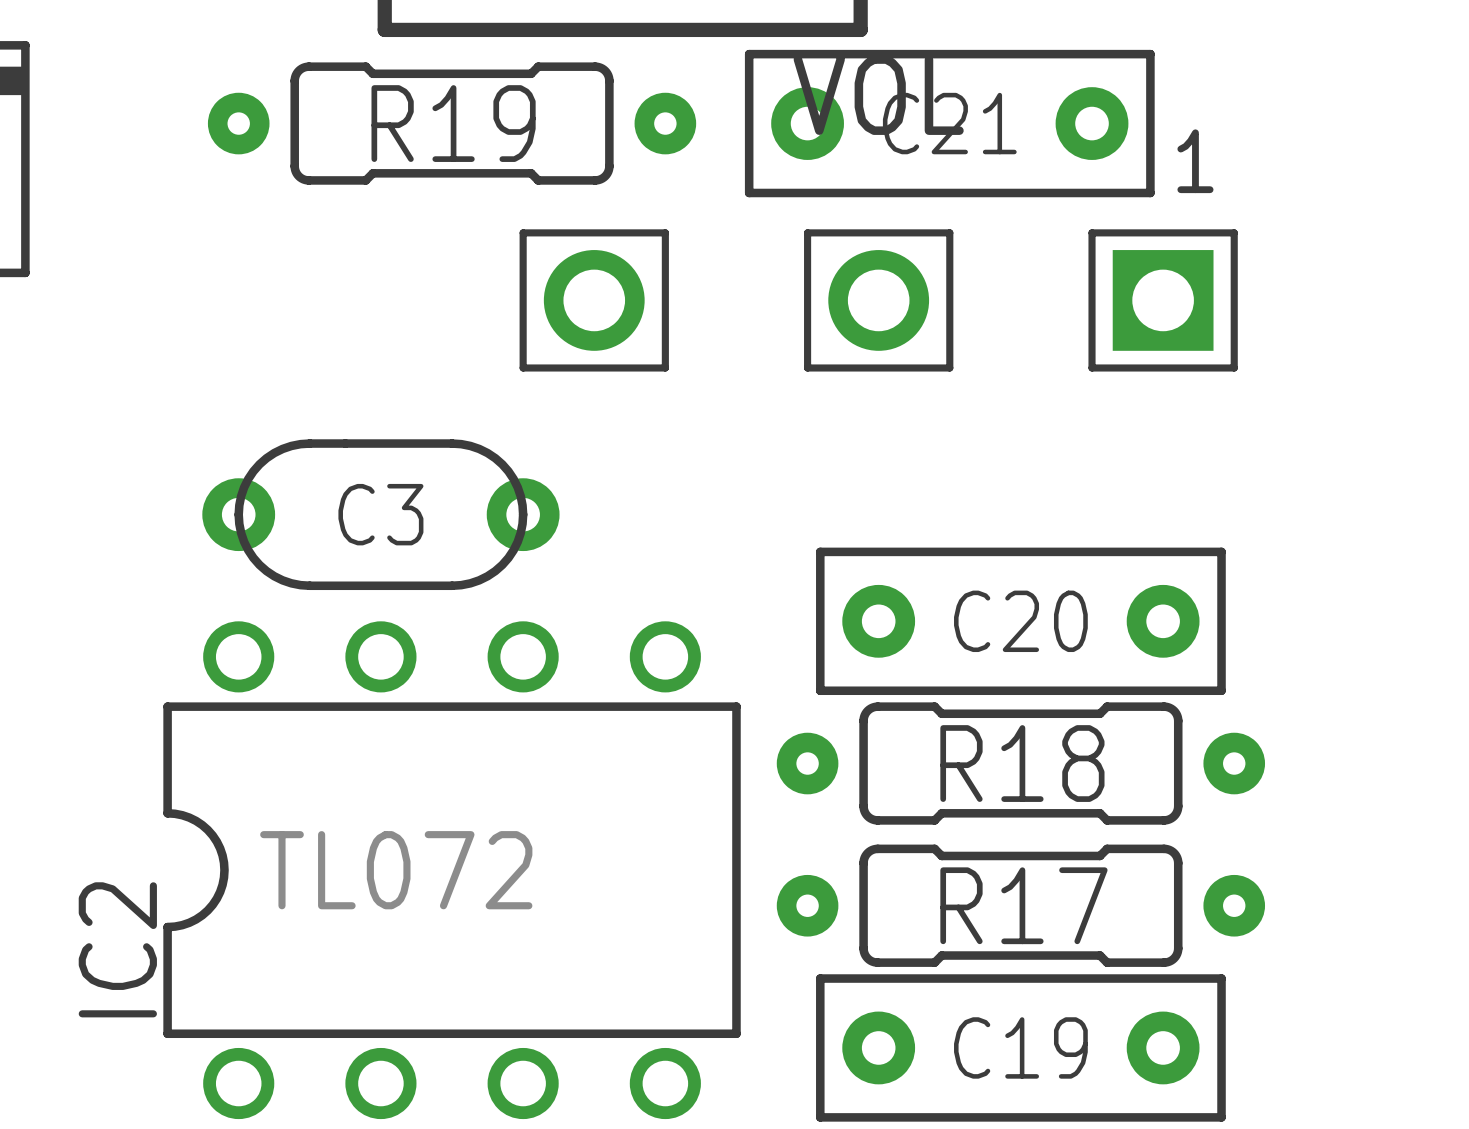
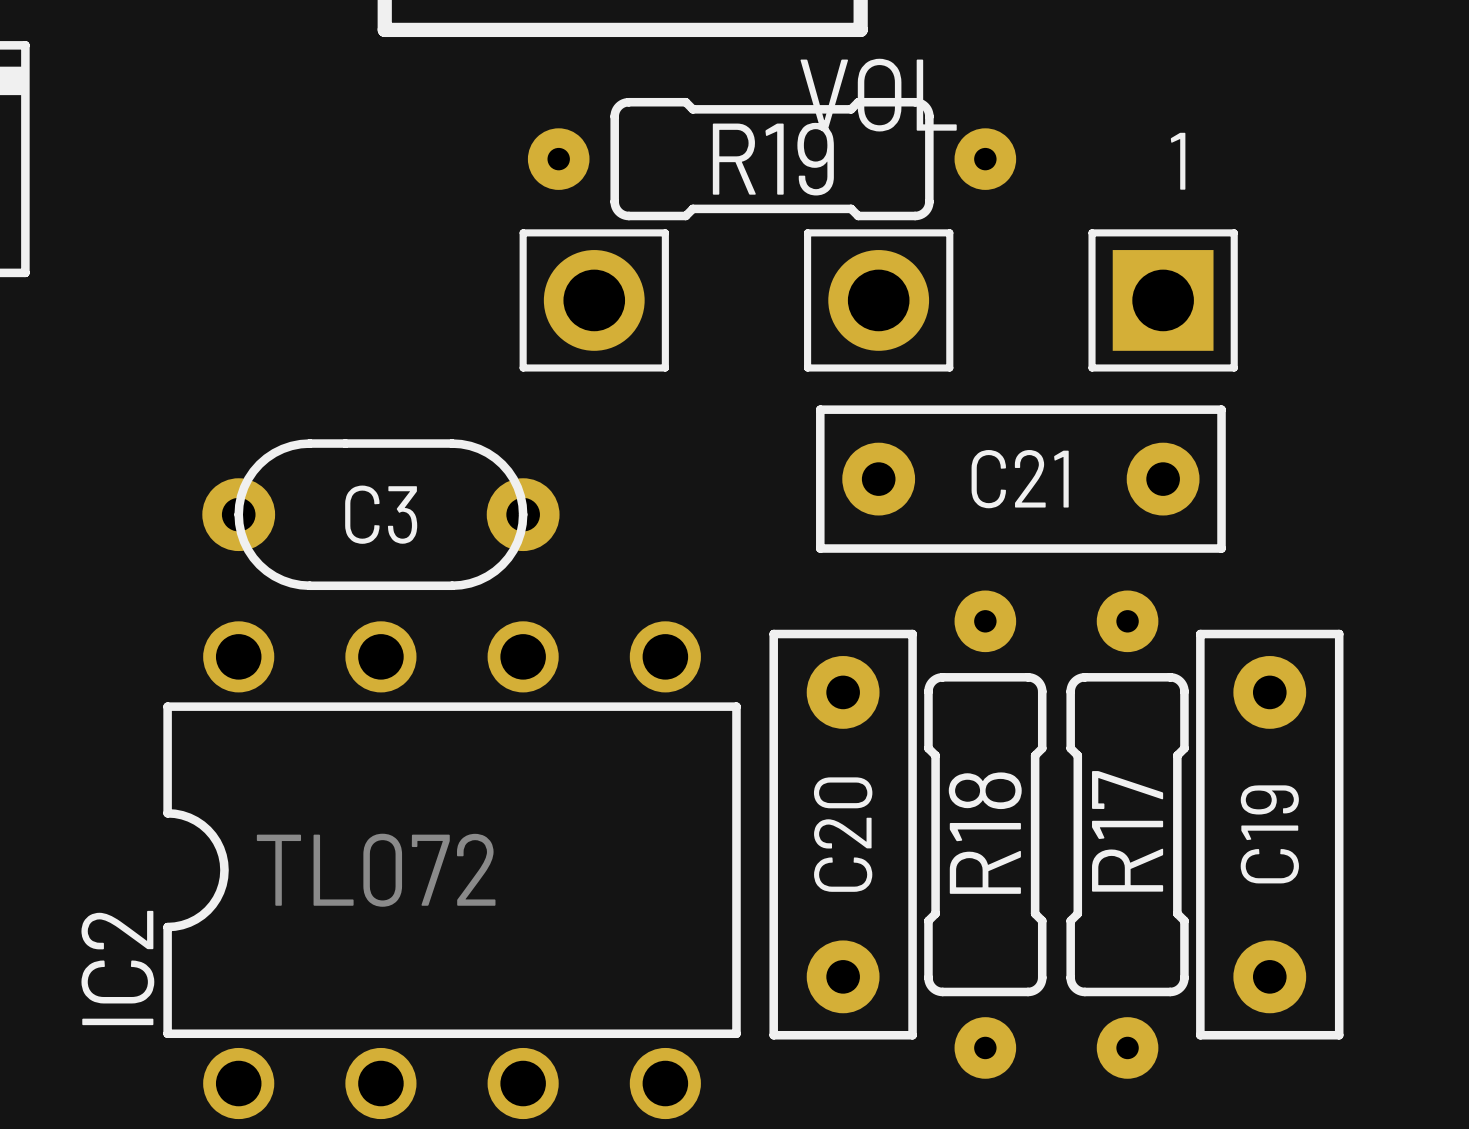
R19 position: (452, 123) -> (772, 159)
C21 position: (949, 123) -> (1020, 479)
C20 rotation: 0° (1020, 621) -> 90° clockwise (843, 834)
C20 position: (1020, 621) -> (843, 834)
R18 rotation: 0° (1020, 763) -> 90° clockwise (985, 834)
R17 rotation: 0° (1020, 905) -> 90° clockwise (1127, 834)
C19 rotation: 0° (1020, 1047) -> 90° clockwise (1269, 834)
C19 position: (1020, 1047) -> (1269, 834)

